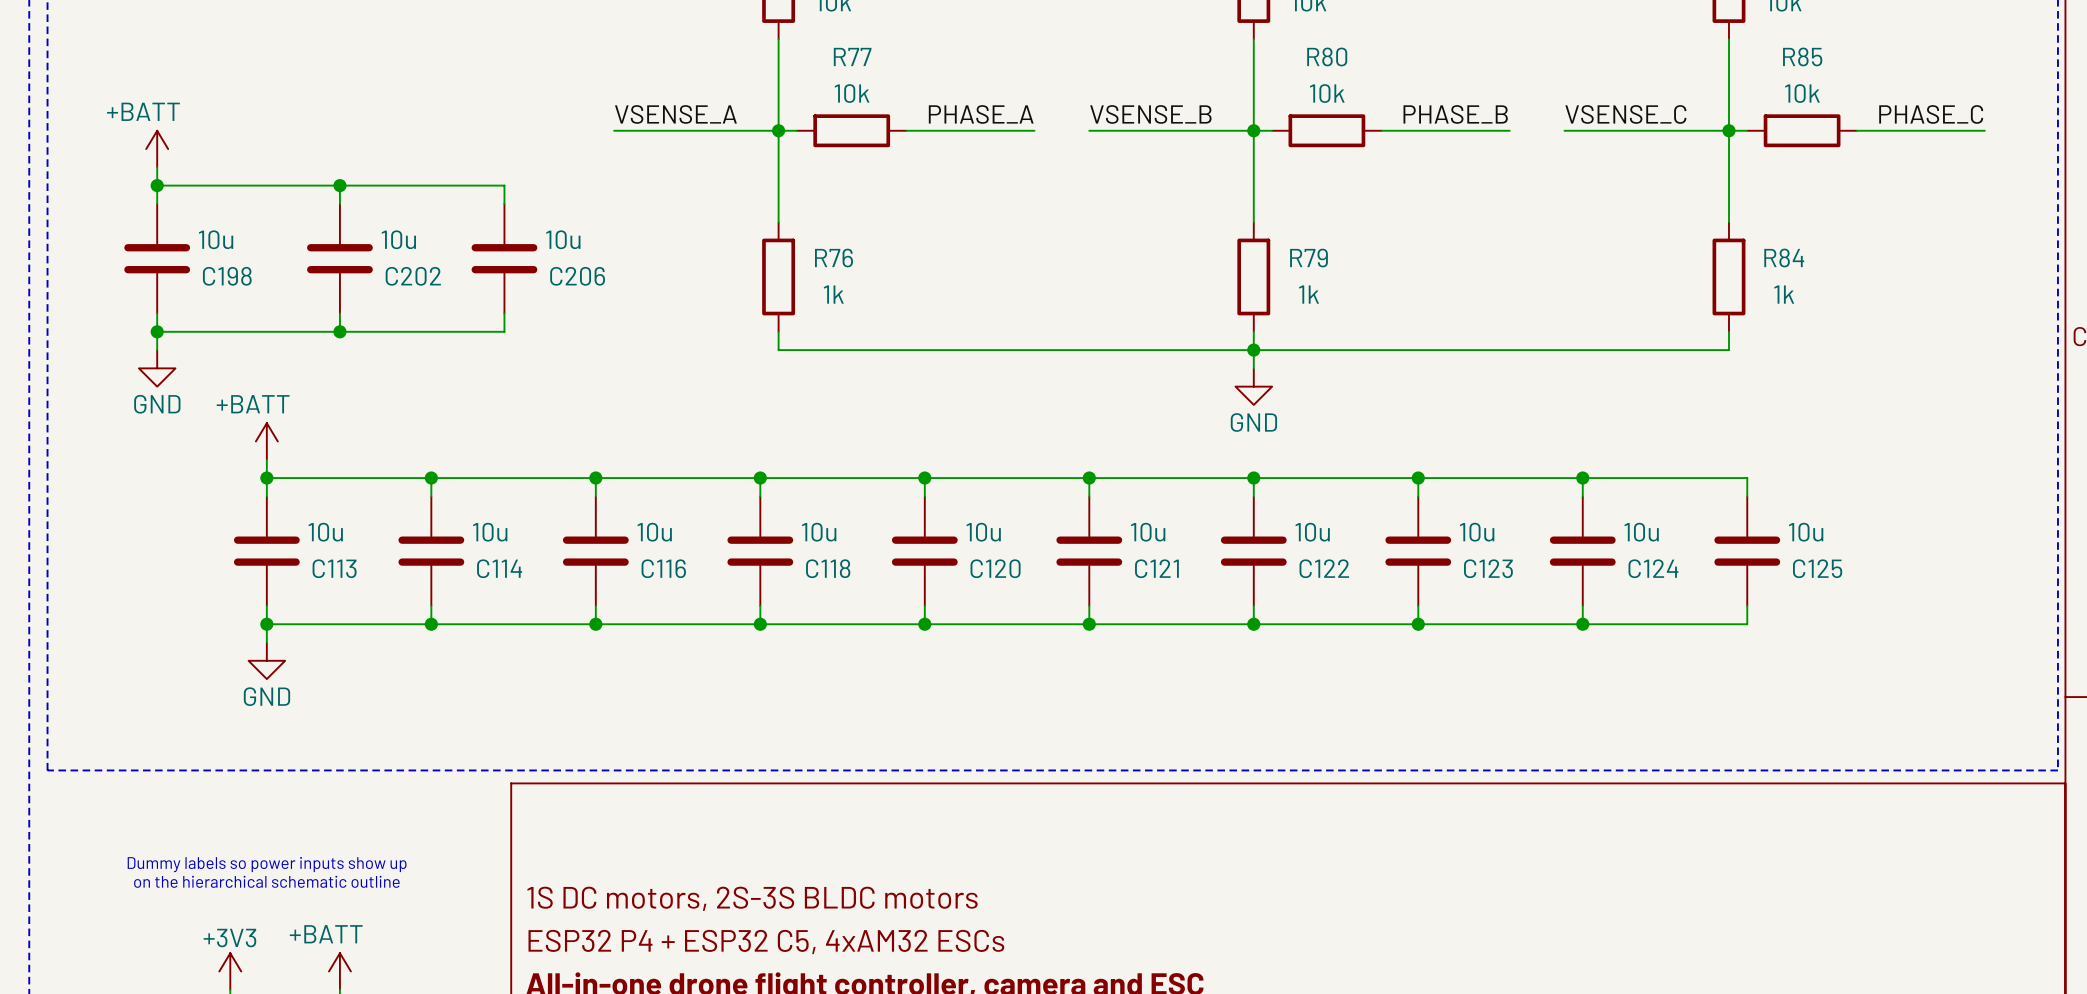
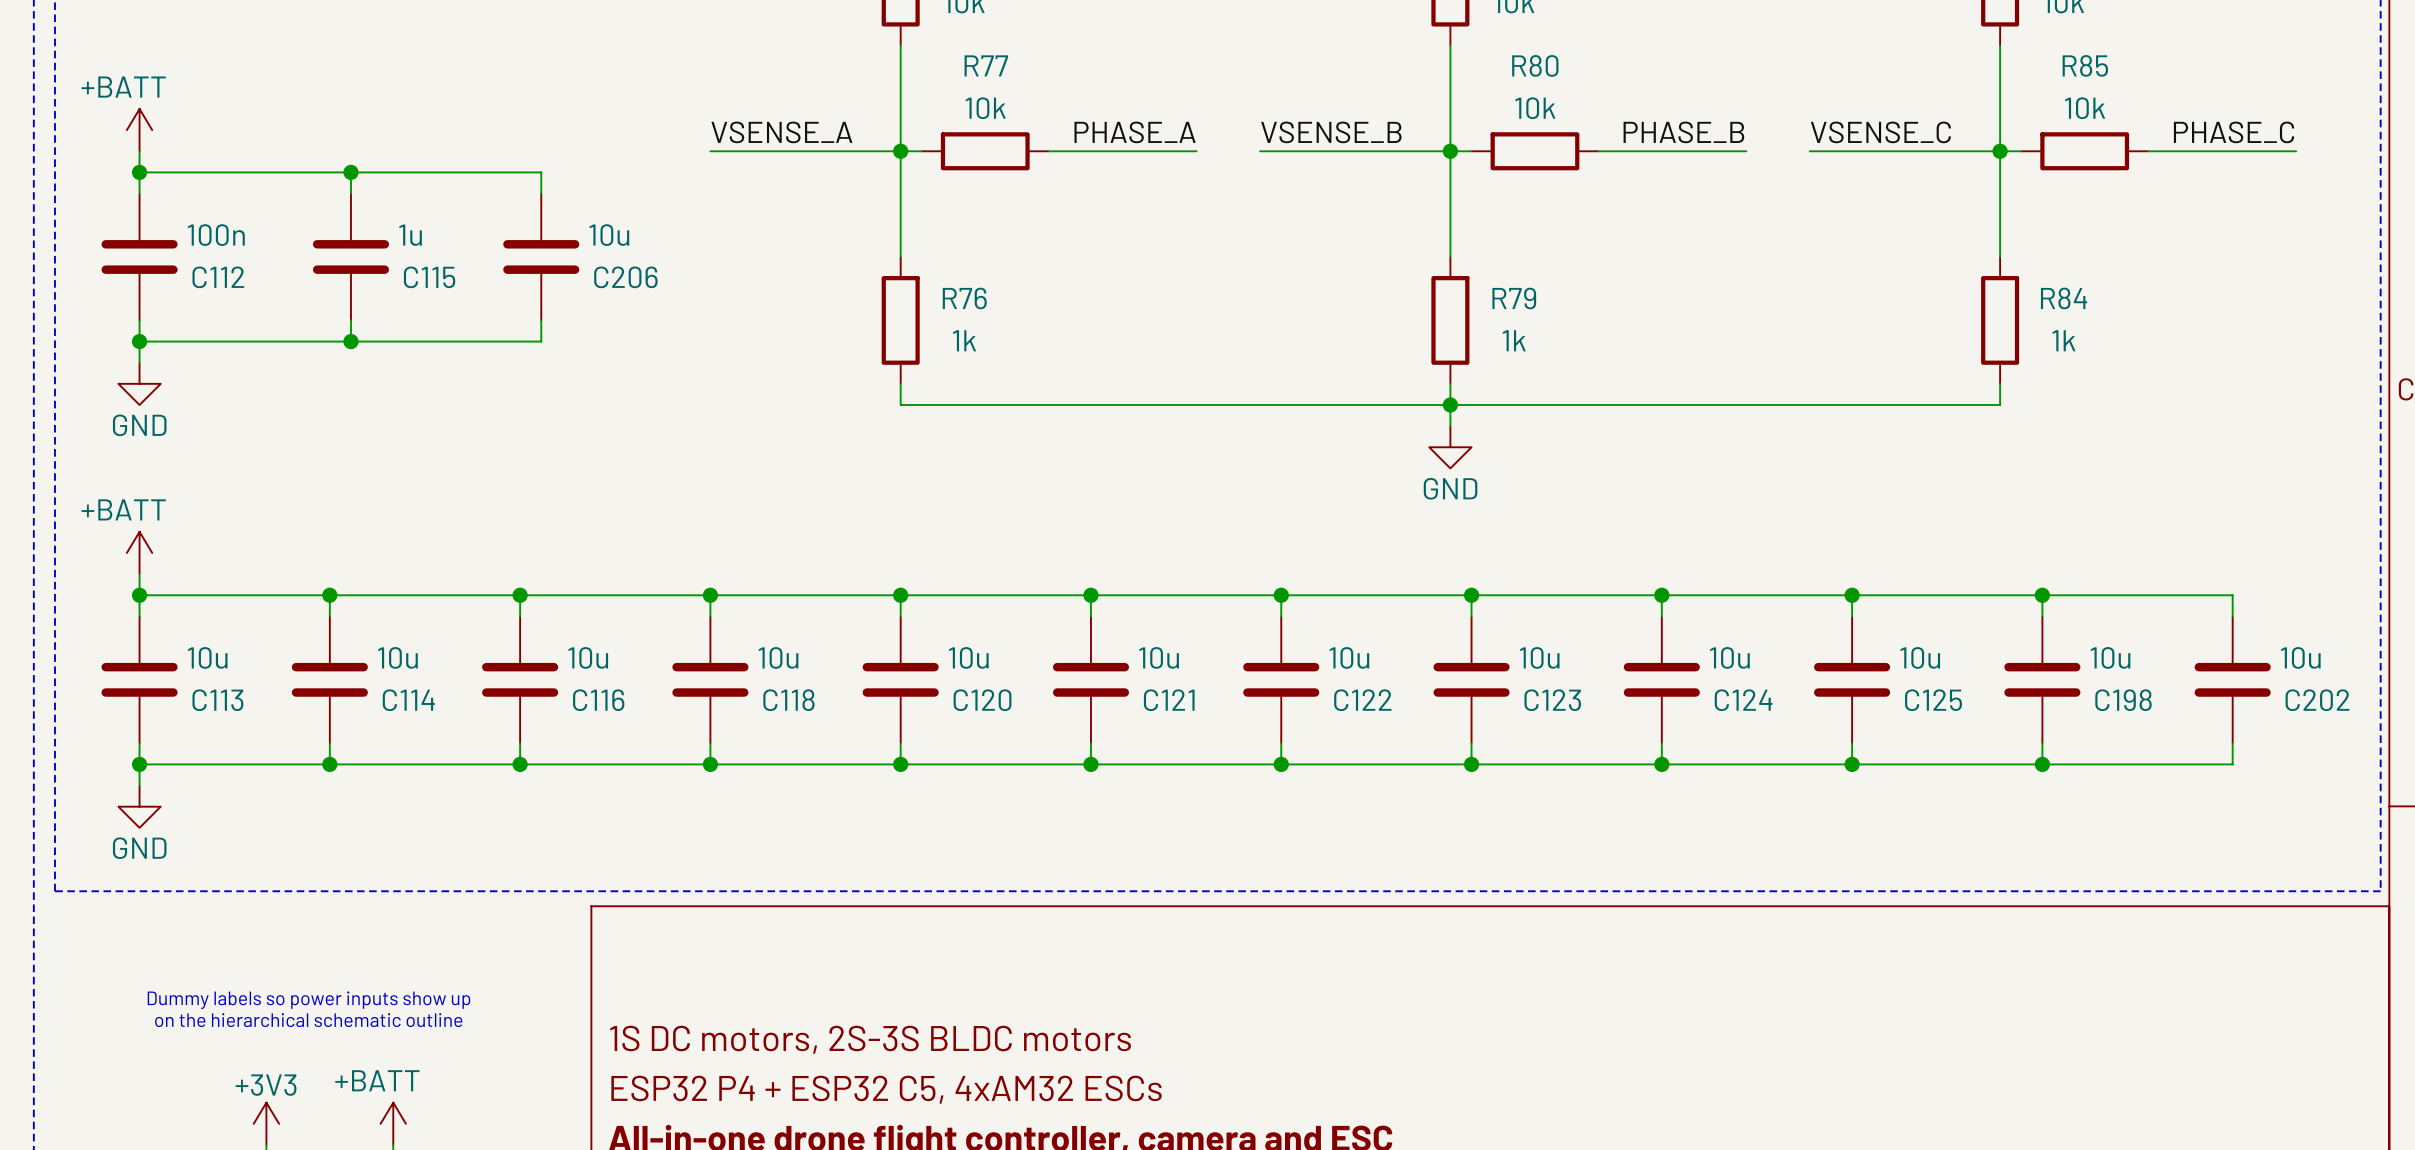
power symbol position: +BATT (157, 149) -> +BATT (139, 130)
wire: (157, 167) (157, 203) -> (139, 151) (139, 193)
wire: (157, 185) (504, 185) (504, 203) -> (139, 172) (541, 172) (541, 193)
junction position: (157, 185) -> (139, 172)
wire: (339, 185) (339, 203) -> (350, 172) (350, 193)
junction position: (339, 185) -> (350, 172)
C112: none -> 100n (139, 256)
C115: none -> 1u (350, 256)
C198 position: (157, 258) -> (2042, 679)
C202 position: (339, 258) -> (2232, 679)
C206 position: (504, 258) -> (541, 256)
wire: (157, 313) (157, 350) -> (139, 320) (139, 362)
wire: (339, 313) (339, 331) -> (350, 320) (350, 341)
wire: (504, 313) (504, 331) (157, 331) -> (541, 320) (541, 341) (139, 341)
junction position: (157, 331) -> (139, 341)
junction position: (339, 331) -> (350, 341)
power symbol position: GND (157, 368) -> GND (139, 383)
power symbol position: +BATT (266, 441) -> +BATT (139, 552)
wire: (266, 459) (266, 496) -> (139, 574) (139, 616)
wire: (266, 478) (1747, 478) (1747, 496) -> none
junction position: (266, 478) -> (329, 595)
wire: (431, 478) (431, 496) -> (329, 595) (329, 616)
junction position: (431, 478) -> (520, 595)
wire: (595, 478) (595, 496) -> (520, 595) (520, 616)
junction position: (595, 478) -> (710, 595)
wire: (760, 478) (760, 496) -> (710, 595) (710, 616)
junction position: (760, 478) -> (900, 595)
wire: (924, 478) (924, 496) -> (900, 595) (900, 616)
junction position: (924, 478) -> (1090, 595)
wire: (1089, 478) (1089, 496) -> (1090, 595) (1090, 616)
junction position: (1089, 478) -> (1281, 595)
wire: (1253, 478) (1253, 496) -> (1281, 595) (1281, 616)
junction position: (1253, 478) -> (1471, 595)
wire: (1418, 478) (1418, 496) -> (1471, 595) (1471, 616)
junction position: (1418, 478) -> (1661, 595)
wire: (1582, 478) (1582, 496) -> (1661, 595) (1661, 616)
junction position: (1582, 478) -> (1852, 595)
wire: none -> (139, 595) (2232, 595) (2232, 616)
junction: none -> (139, 595)
wire: none -> (1852, 595) (1852, 616)
wire: none -> (2042, 595) (2042, 616)
junction: none -> (2042, 595)
C113 position: (266, 551) -> (139, 679)
C114 position: (431, 551) -> (329, 679)
C116 position: (595, 551) -> (520, 679)
C118 position: (760, 551) -> (710, 679)
C120 position: (924, 551) -> (900, 679)
C121 position: (1089, 551) -> (1090, 679)
C122 position: (1253, 551) -> (1281, 679)
C123 position: (1418, 551) -> (1471, 679)
C124 position: (1582, 551) -> (1661, 679)
C125 position: (1747, 551) -> (1852, 679)
wire: (266, 605) (266, 642) -> (139, 743) (139, 785)
wire: (431, 605) (431, 624) -> (329, 743) (329, 764)
wire: (595, 605) (595, 624) -> (520, 743) (520, 764)
wire: (760, 605) (760, 624) -> (710, 743) (710, 764)
wire: (924, 605) (924, 624) -> (900, 743) (900, 764)
wire: (1089, 605) (1089, 624) -> (1090, 743) (1090, 764)
wire: (1253, 605) (1253, 624) -> (1281, 743) (1281, 764)
wire: (1418, 605) (1418, 624) -> (1471, 743) (1471, 764)
wire: (1582, 605) (1582, 624) -> (1661, 743) (1661, 764)
wire: (1747, 605) (1747, 624) (266, 624) -> none
junction position: (266, 624) -> (329, 764)
junction position: (431, 624) -> (520, 764)
junction position: (595, 624) -> (710, 764)
junction position: (760, 624) -> (900, 764)
junction position: (924, 624) -> (1090, 764)
junction position: (1089, 624) -> (1281, 764)
junction position: (1253, 624) -> (1471, 764)
junction position: (1418, 624) -> (1661, 764)
junction position: (1582, 624) -> (1852, 764)
wire: none -> (1852, 743) (1852, 764)
wire: none -> (2042, 743) (2042, 764)
wire: none -> (2232, 743) (2232, 764) (139, 764)
junction: none -> (139, 764)
power symbol position: GND (266, 660) -> GND (139, 806)
junction: none -> (2042, 764)

